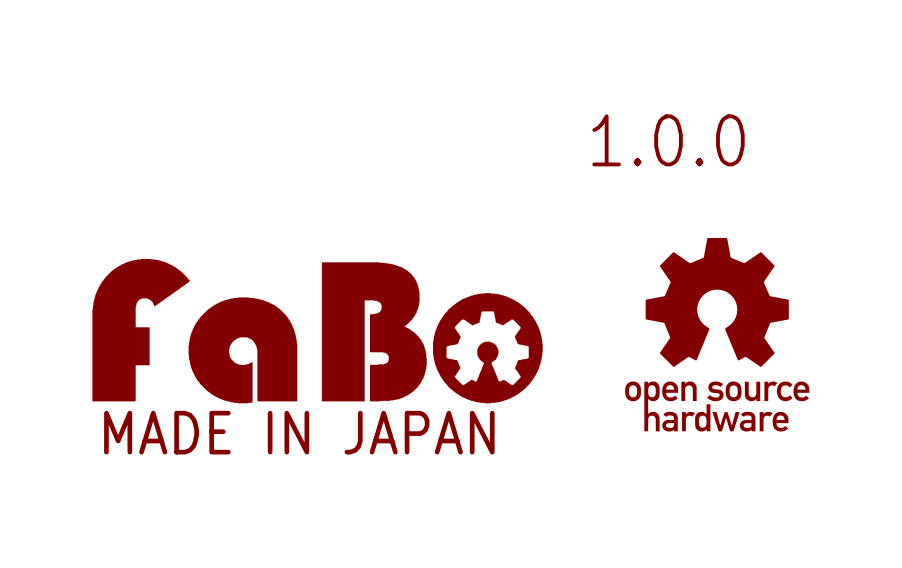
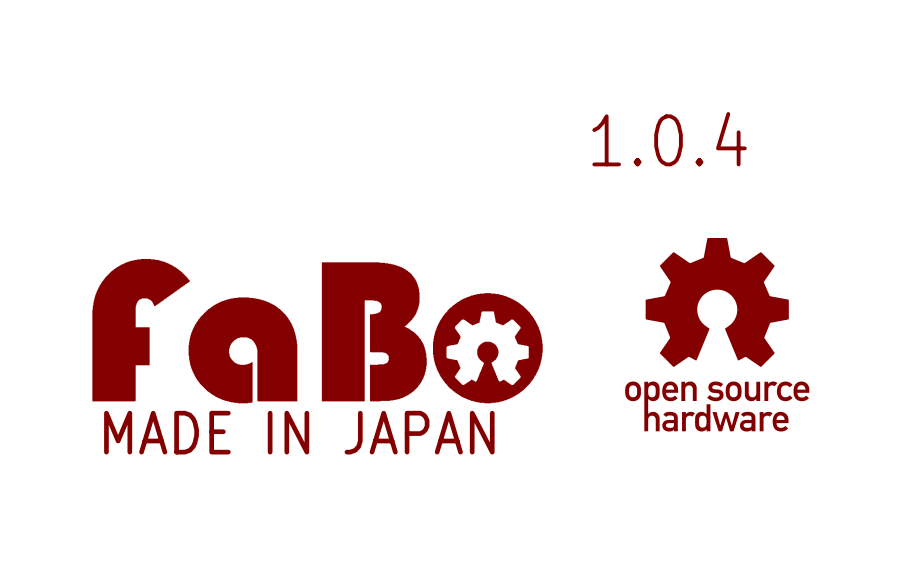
text: 1.0.0 (668, 140) -> 1.0.4 (669, 139)

